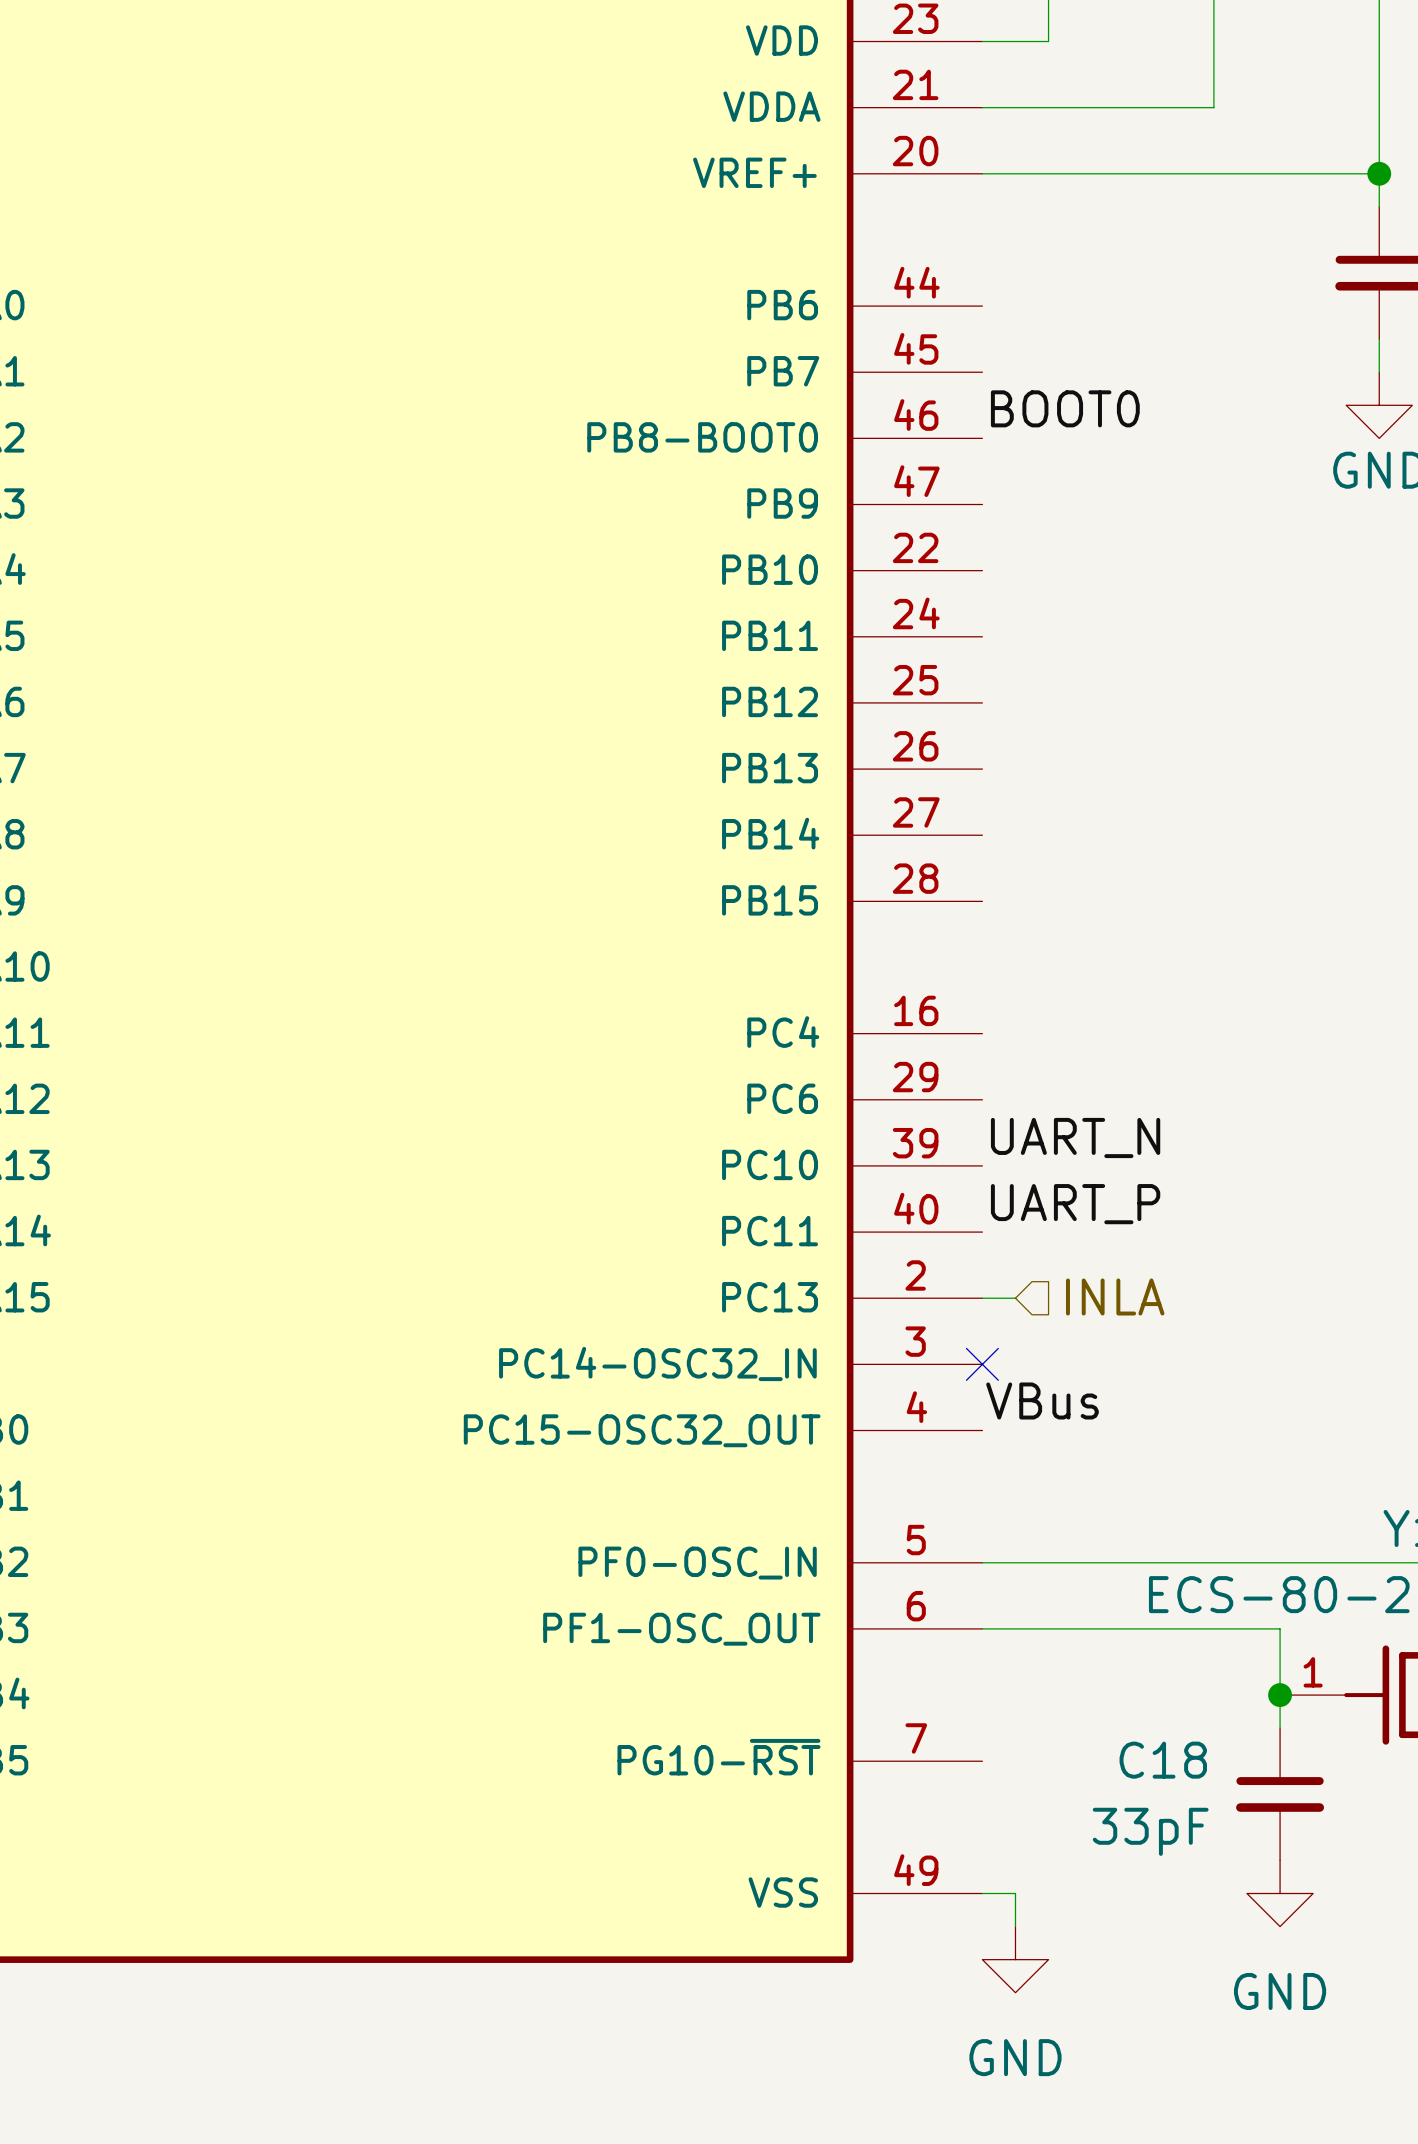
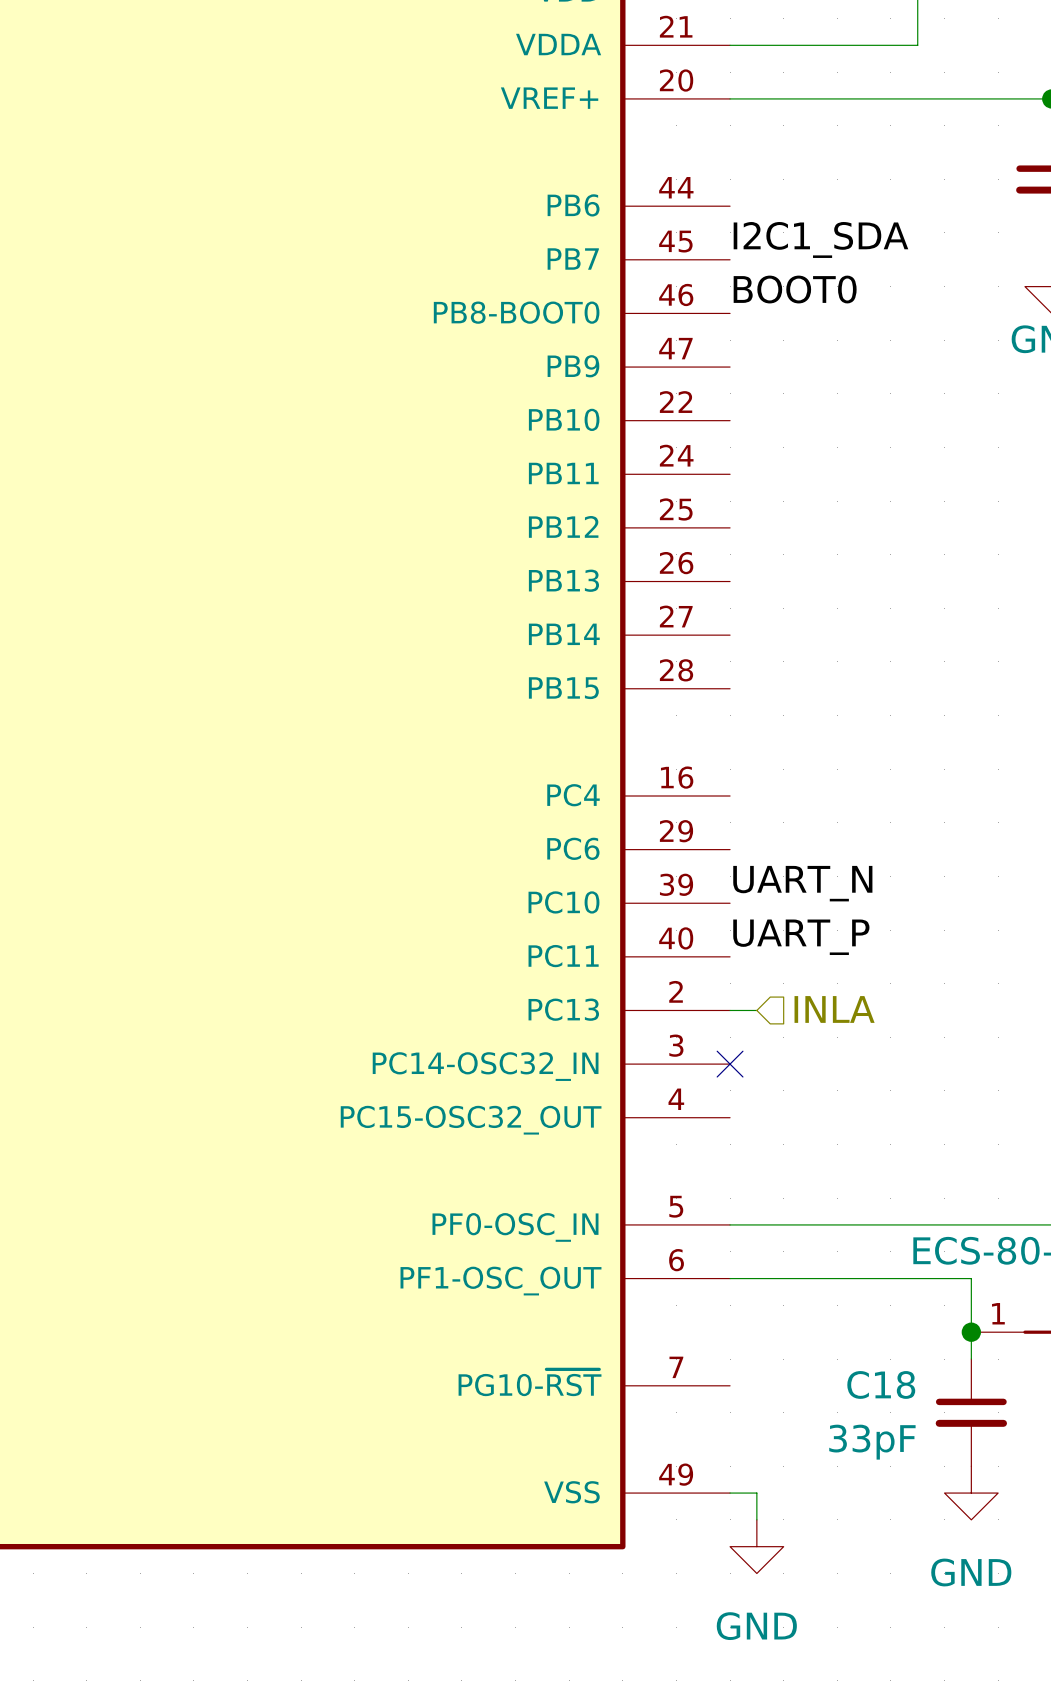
label: none -> I2C1_SDA (820, 239)
label: VBus (1042, 1400) -> none

